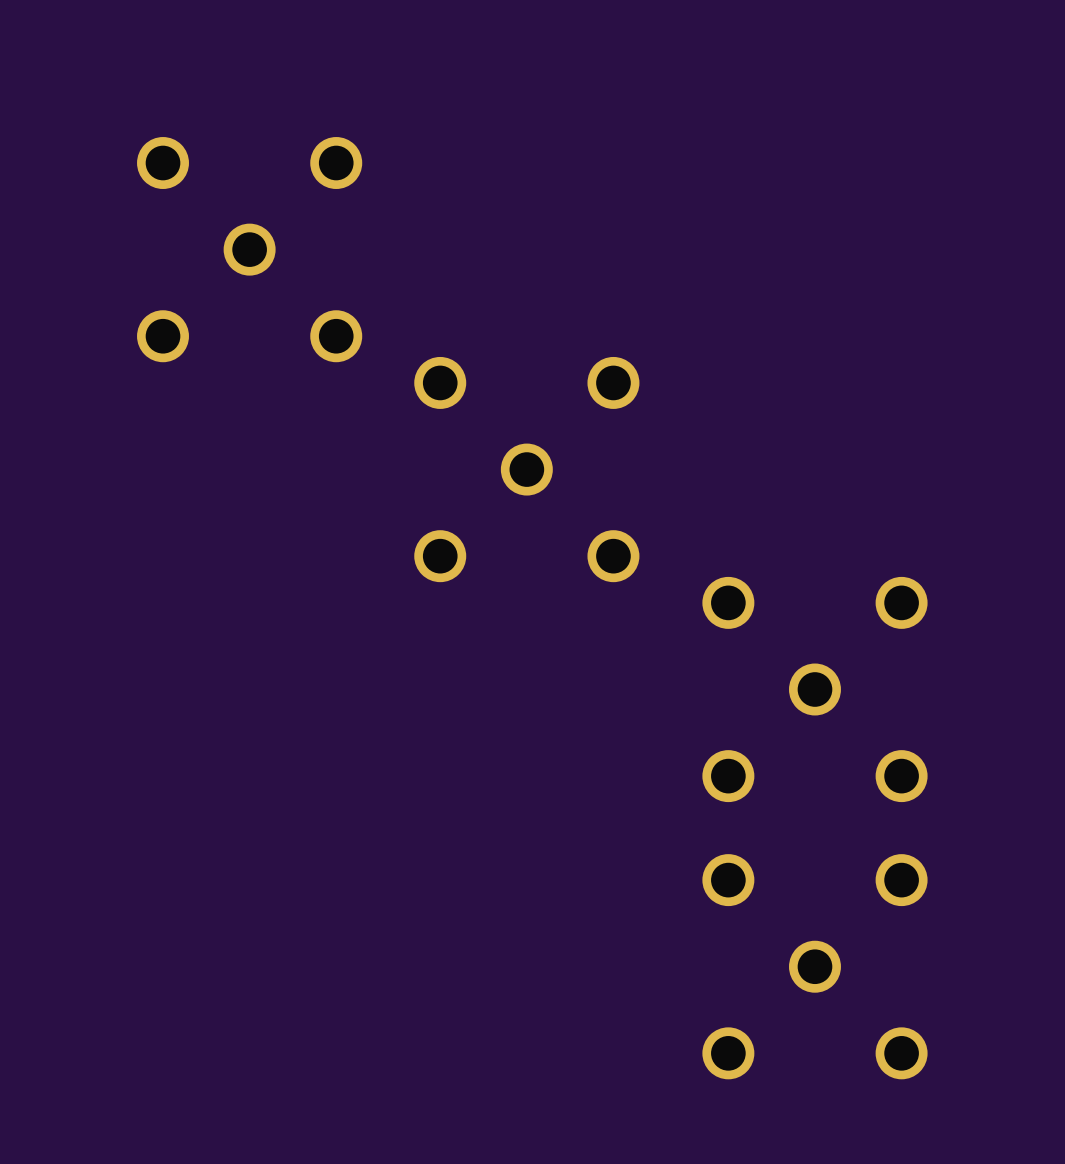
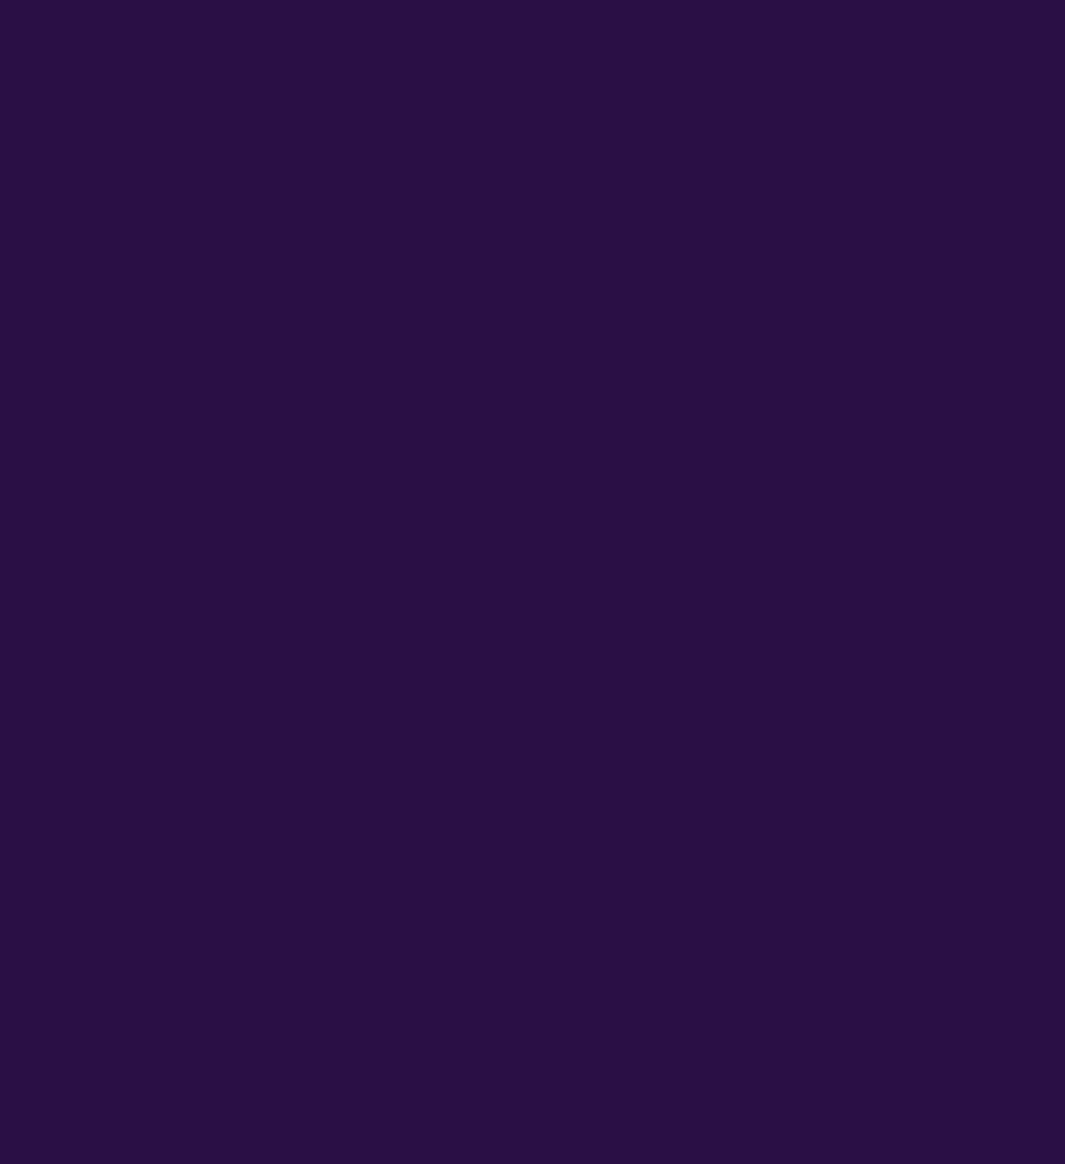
part: (249, 249) -> none
part: (526, 469) -> none
part: (814, 689) -> none
part: (814, 966) -> none

